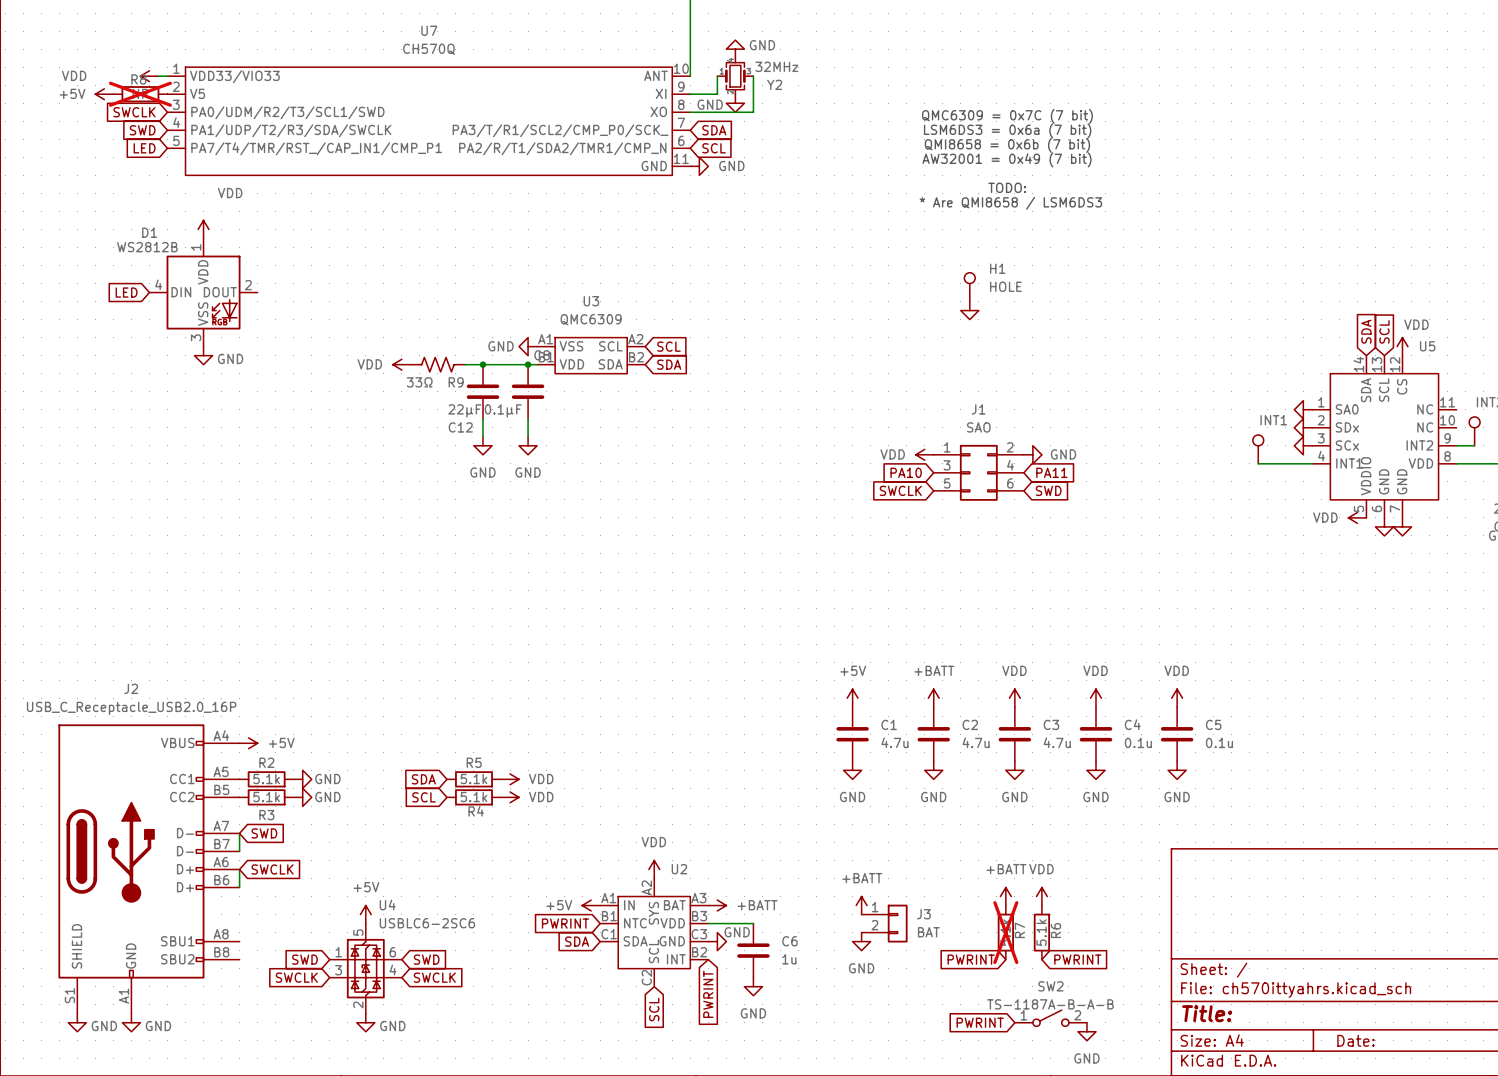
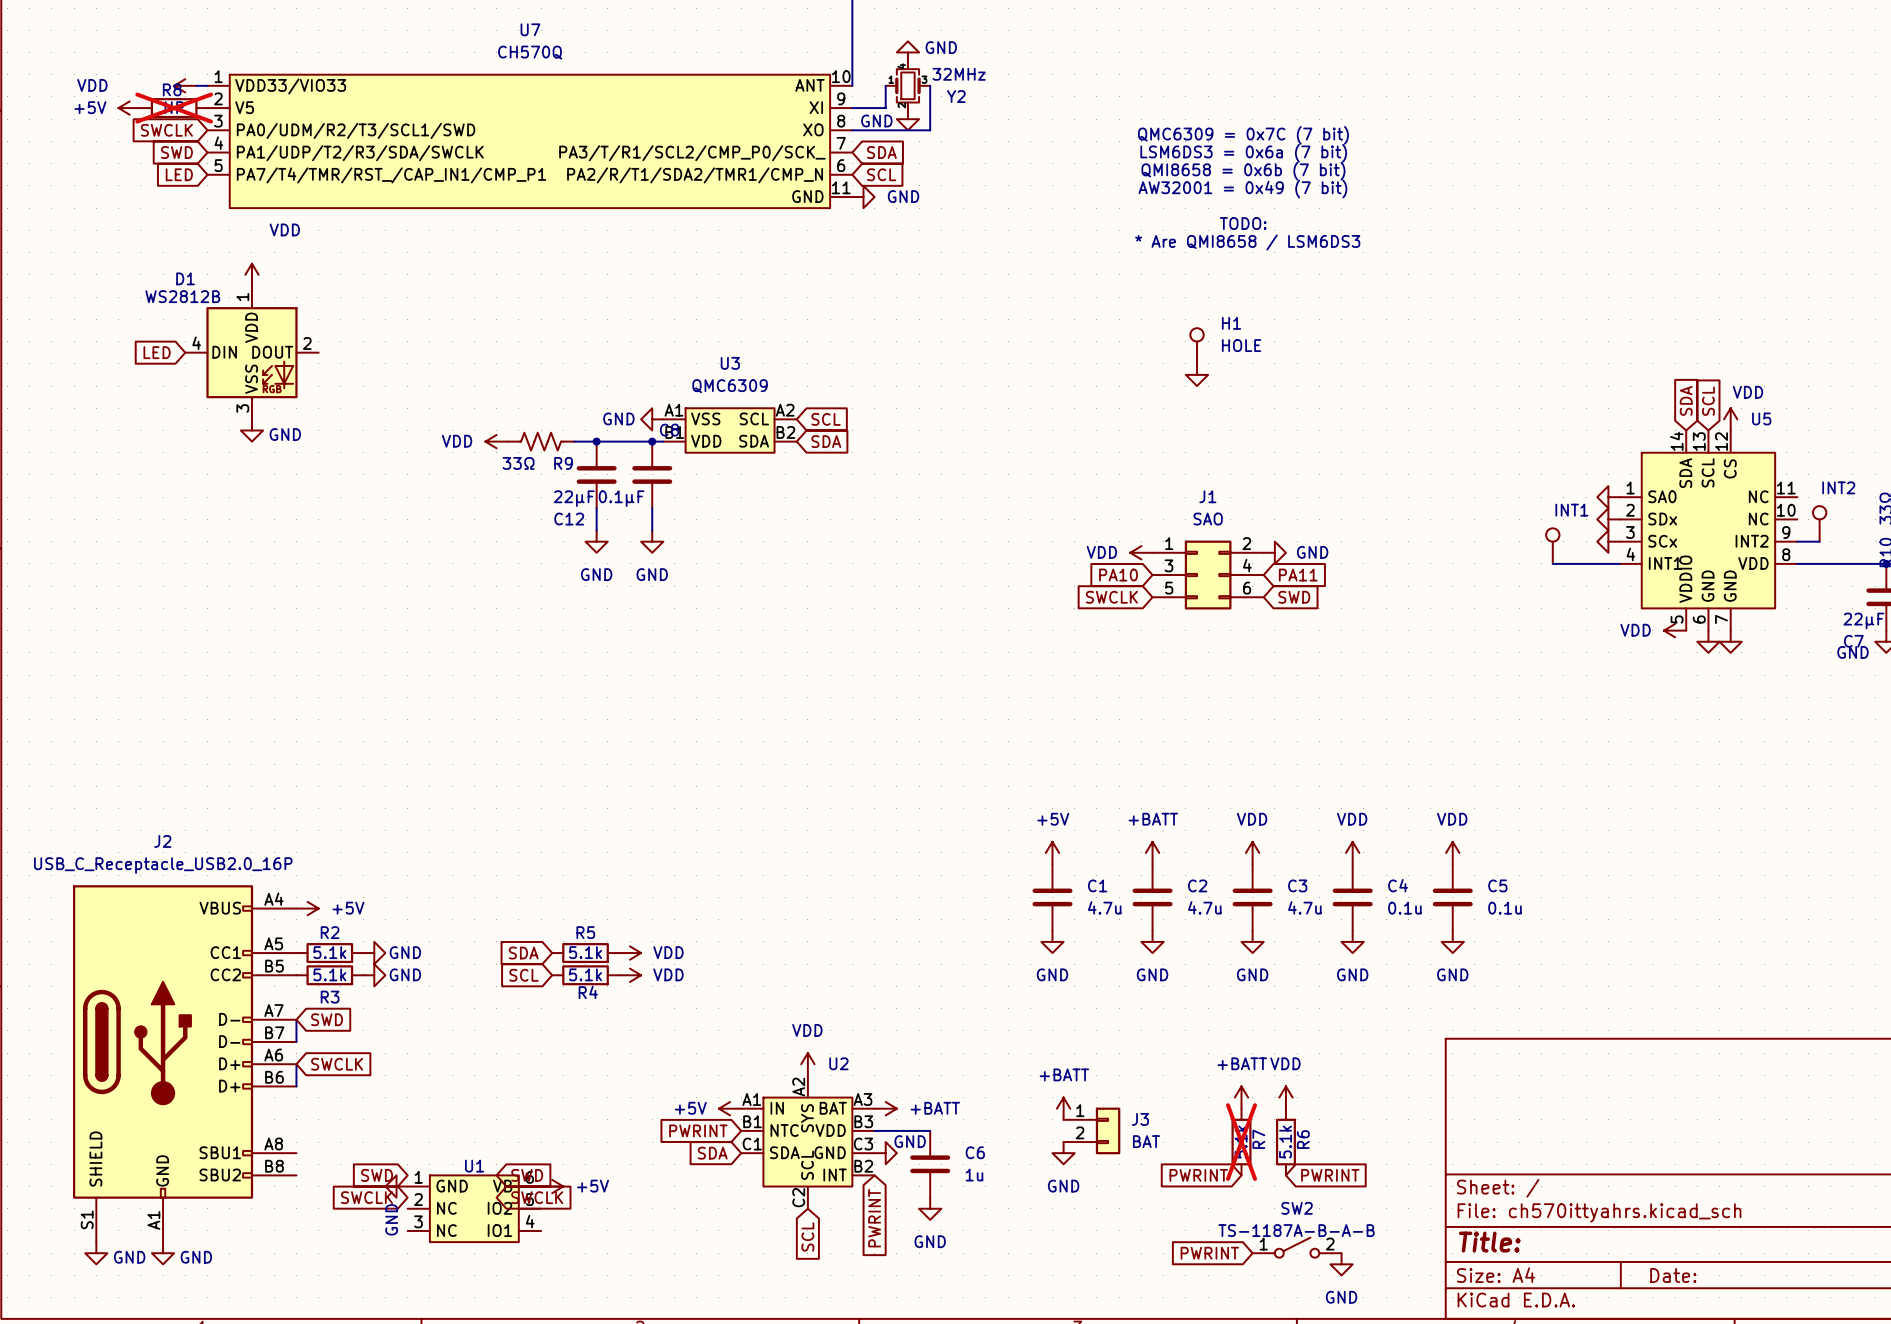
power symbol rotation: 0° (365, 914) -> 90° clockwise (552, 1186)
power symbol position: +5V (365, 914) -> +5V (552, 1186)
U4: USBLC6-2SC6 (365, 968) -> none
U1: none -> (474, 1208)
power symbol rotation: 0° (365, 1022) -> 90° clockwise (396, 1186)
power symbol position: GND (365, 1022) -> GND (396, 1186)

